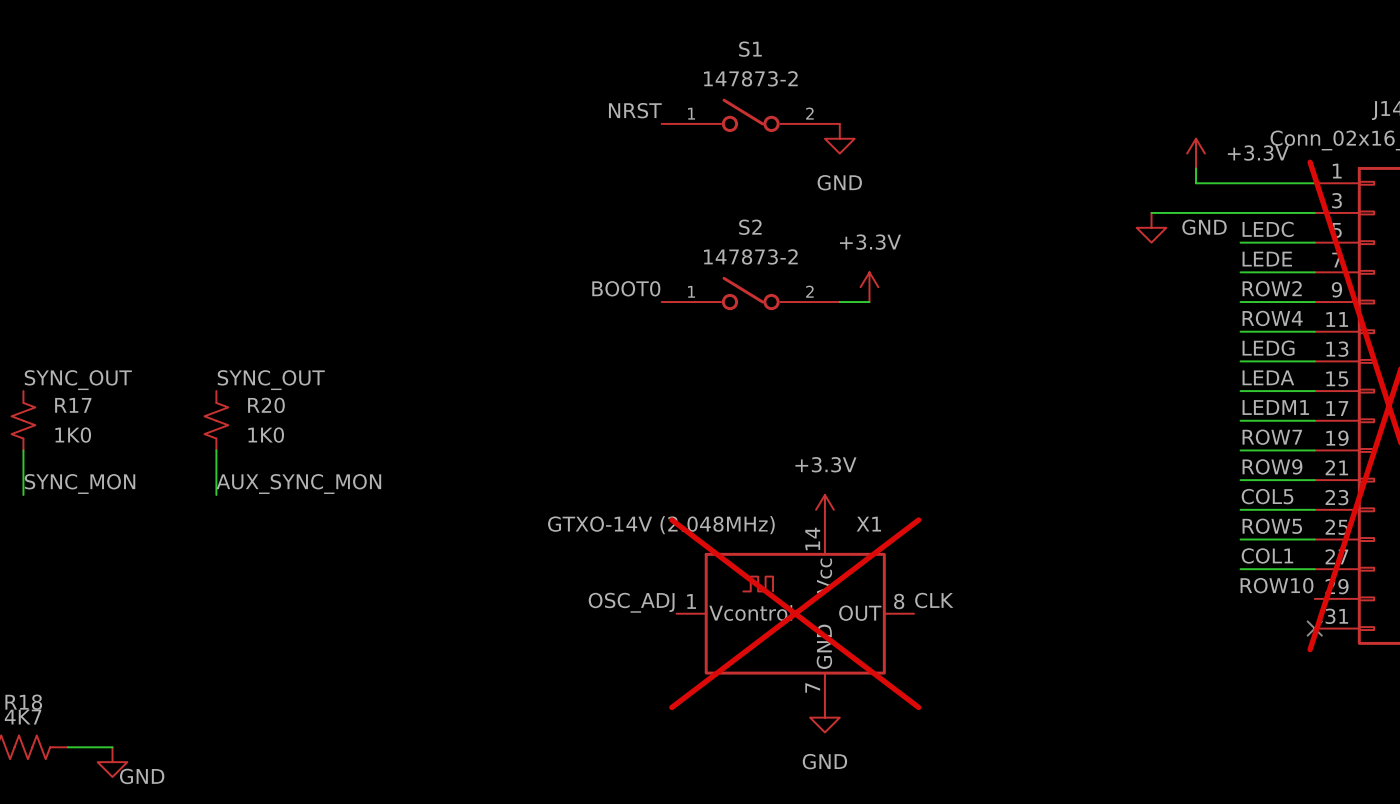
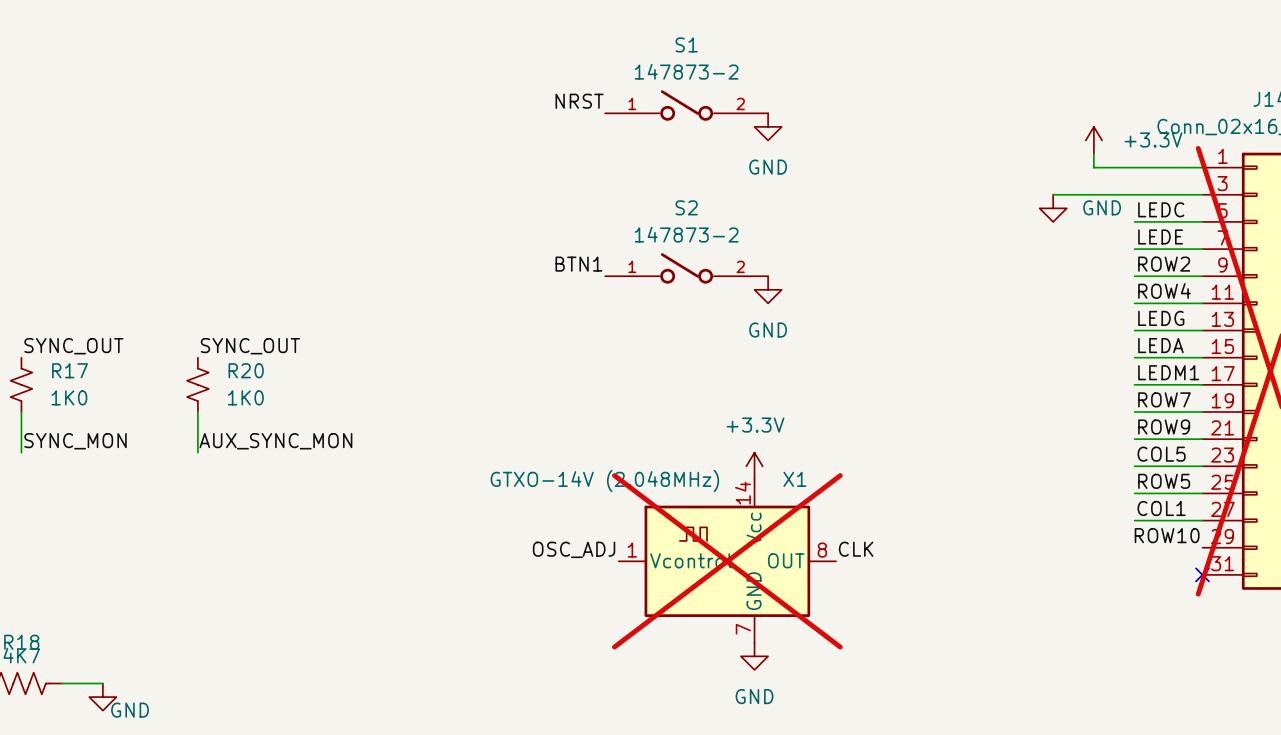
power symbol: +3.3V (869, 287) -> none
label: BOOT0 (626, 288) -> BTN1 (578, 264)
wire: (839, 302) (869, 302) -> none
power symbol: none -> GND (768, 289)

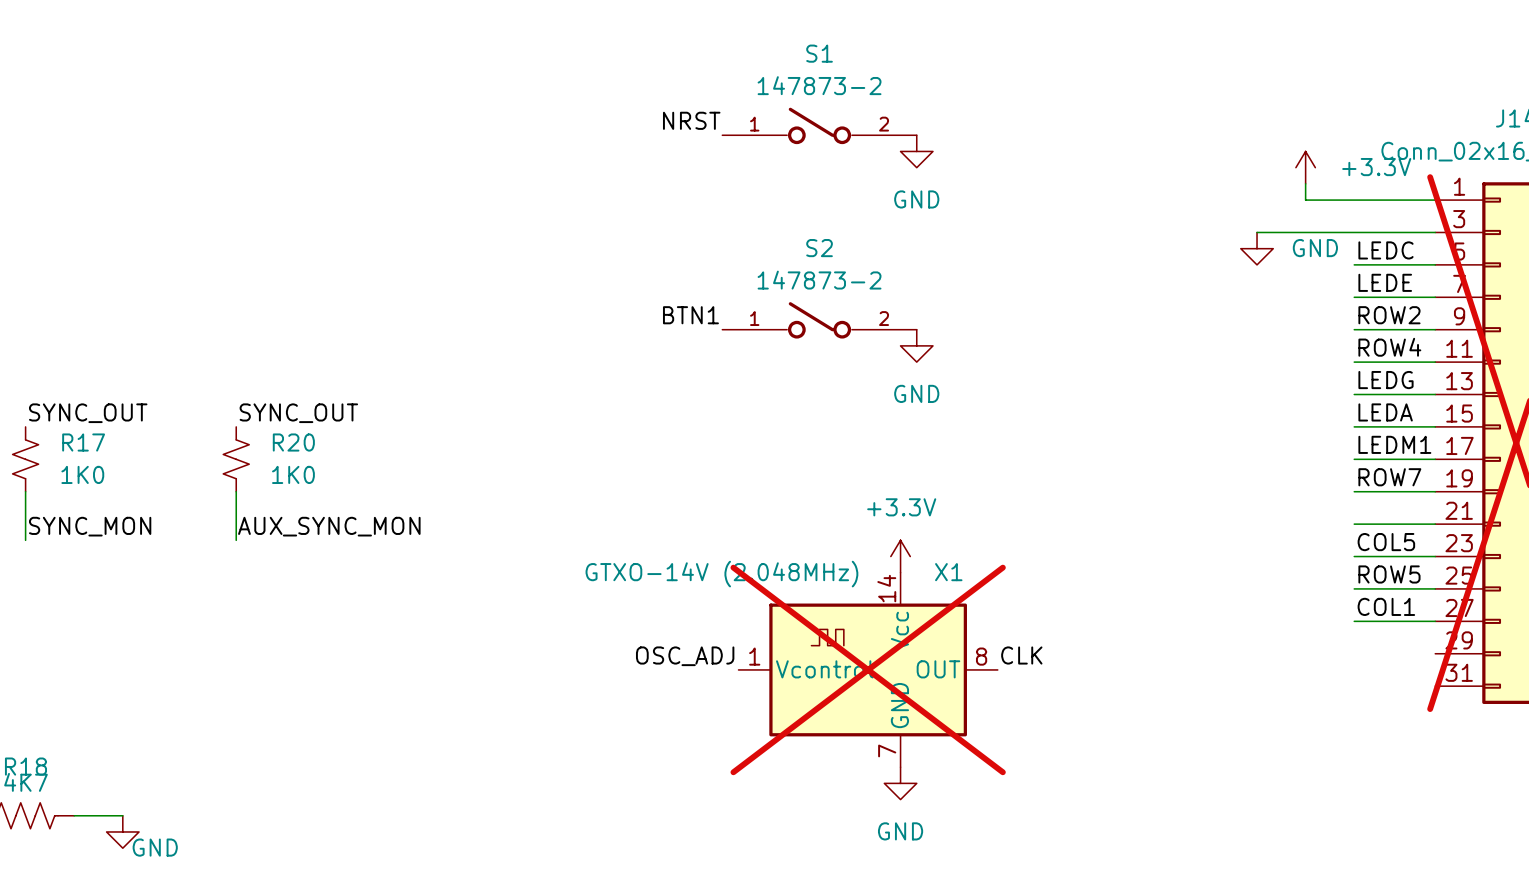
label: ROW9 (1164, 427) -> none
label: ROW10 (1167, 535) -> none
no-connect mark: (1202, 574) -> none

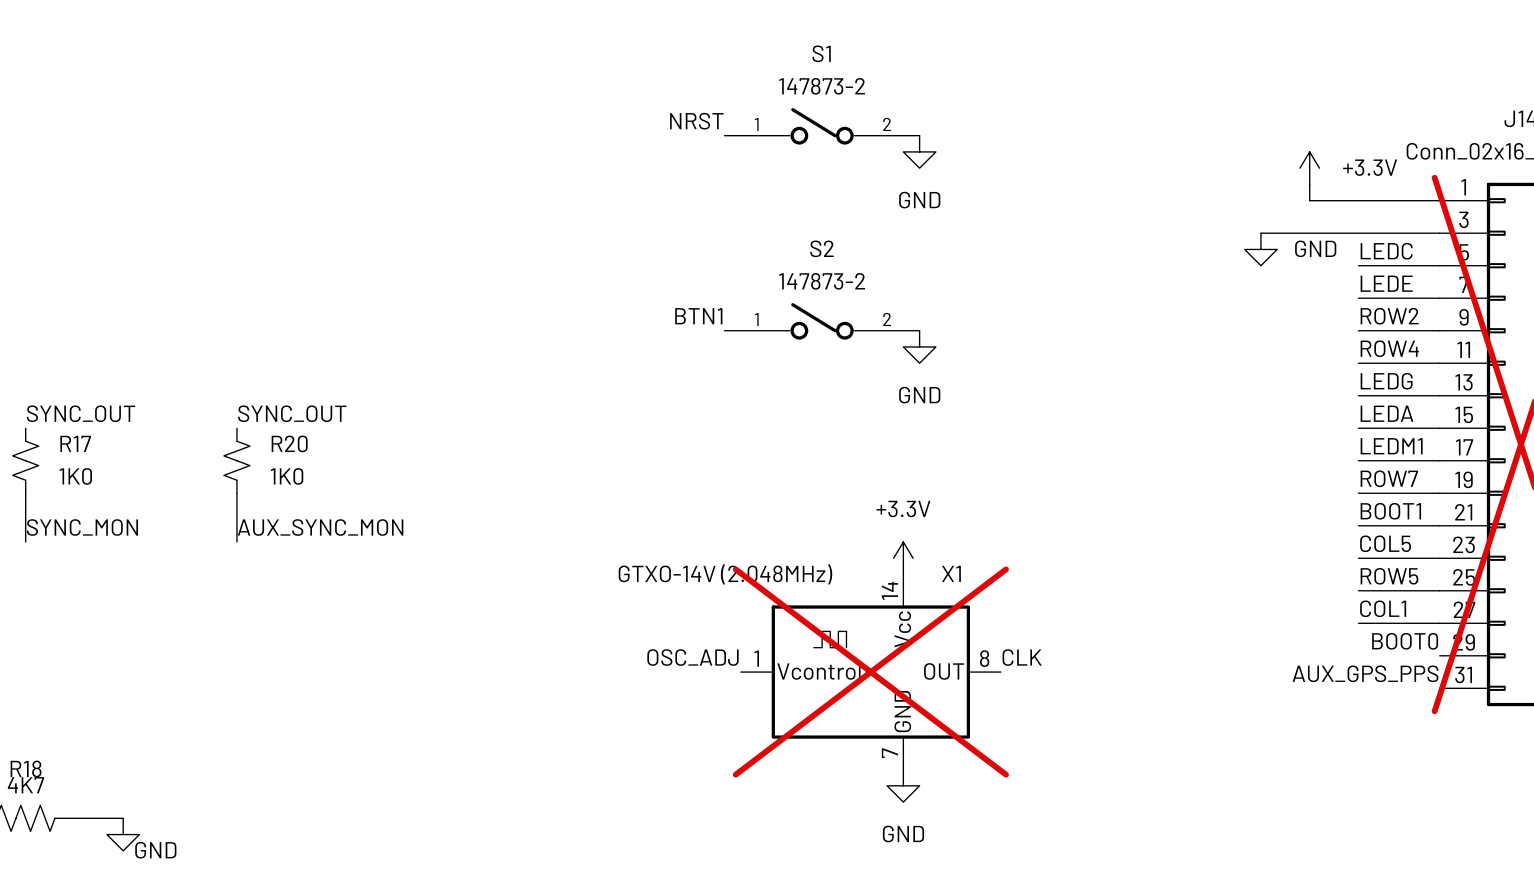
label: none -> BOOT1 (1390, 511)
label: none -> BOOT0 (1405, 641)
label: none -> AUX_GPS_PPS (1365, 673)

